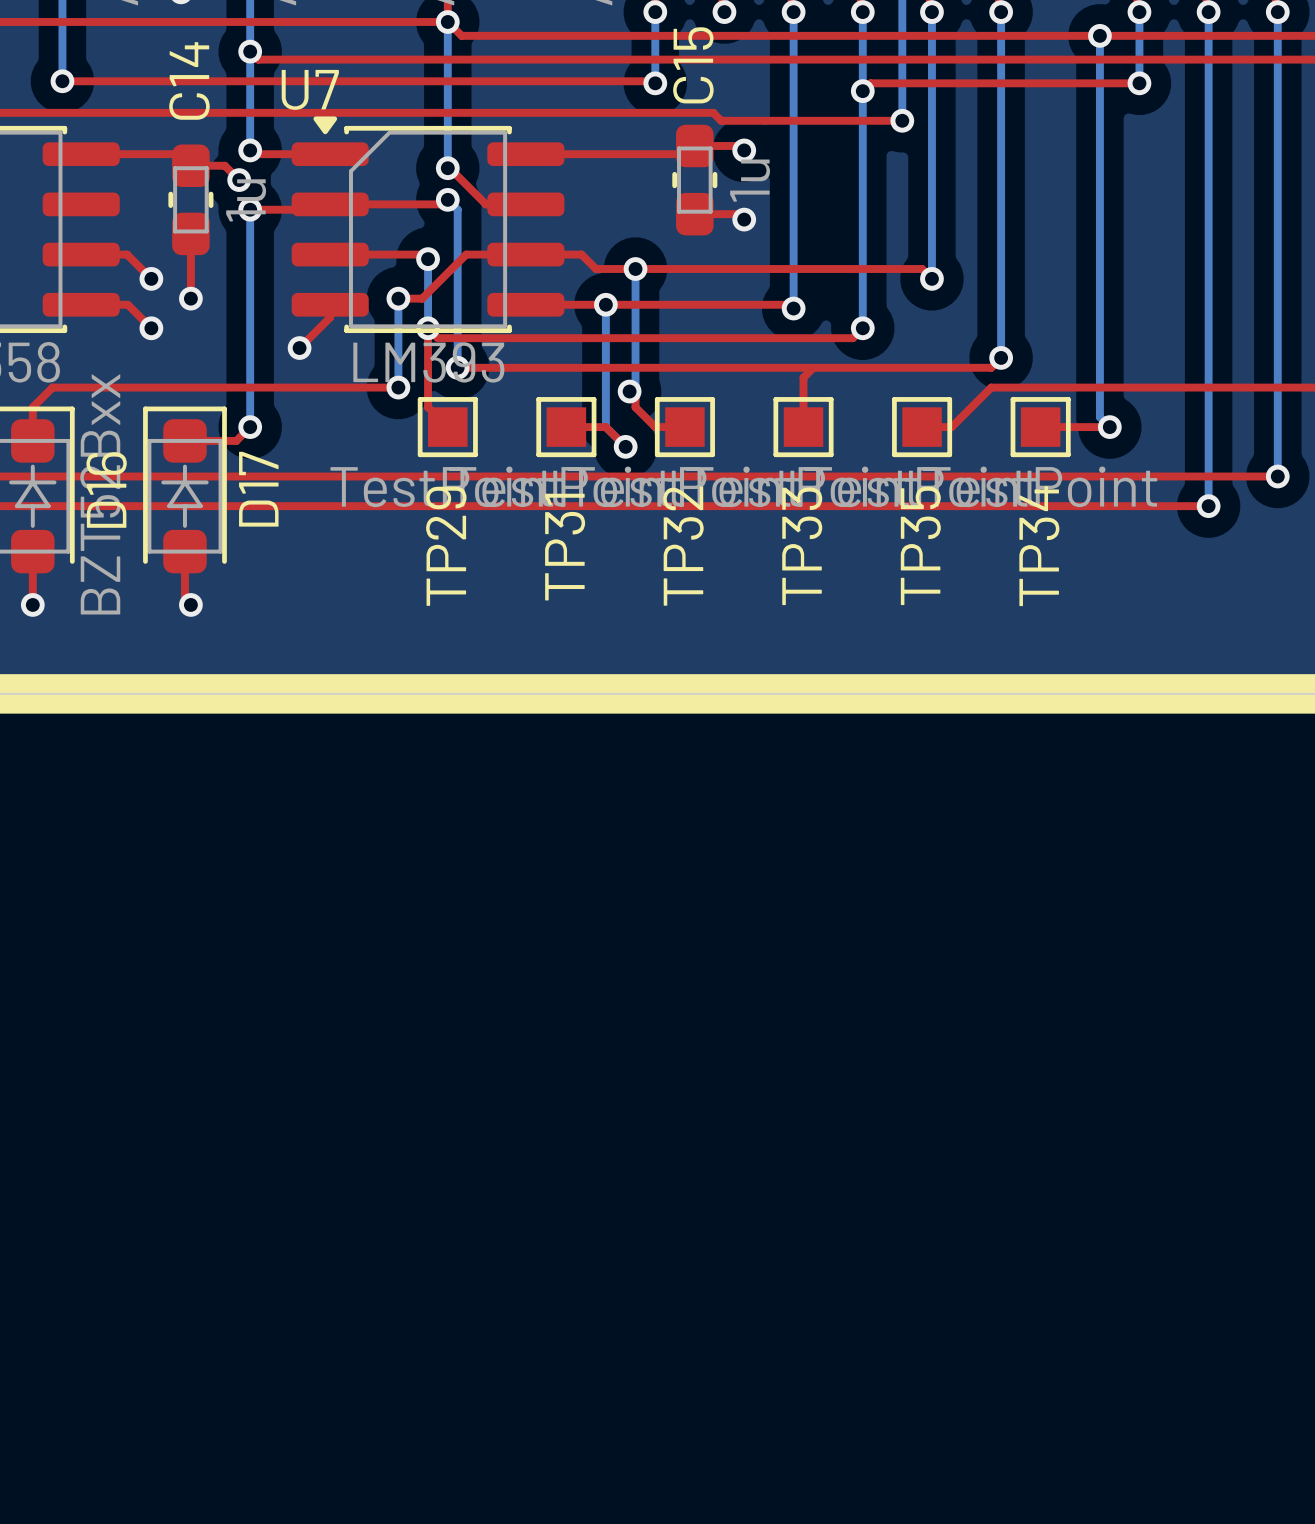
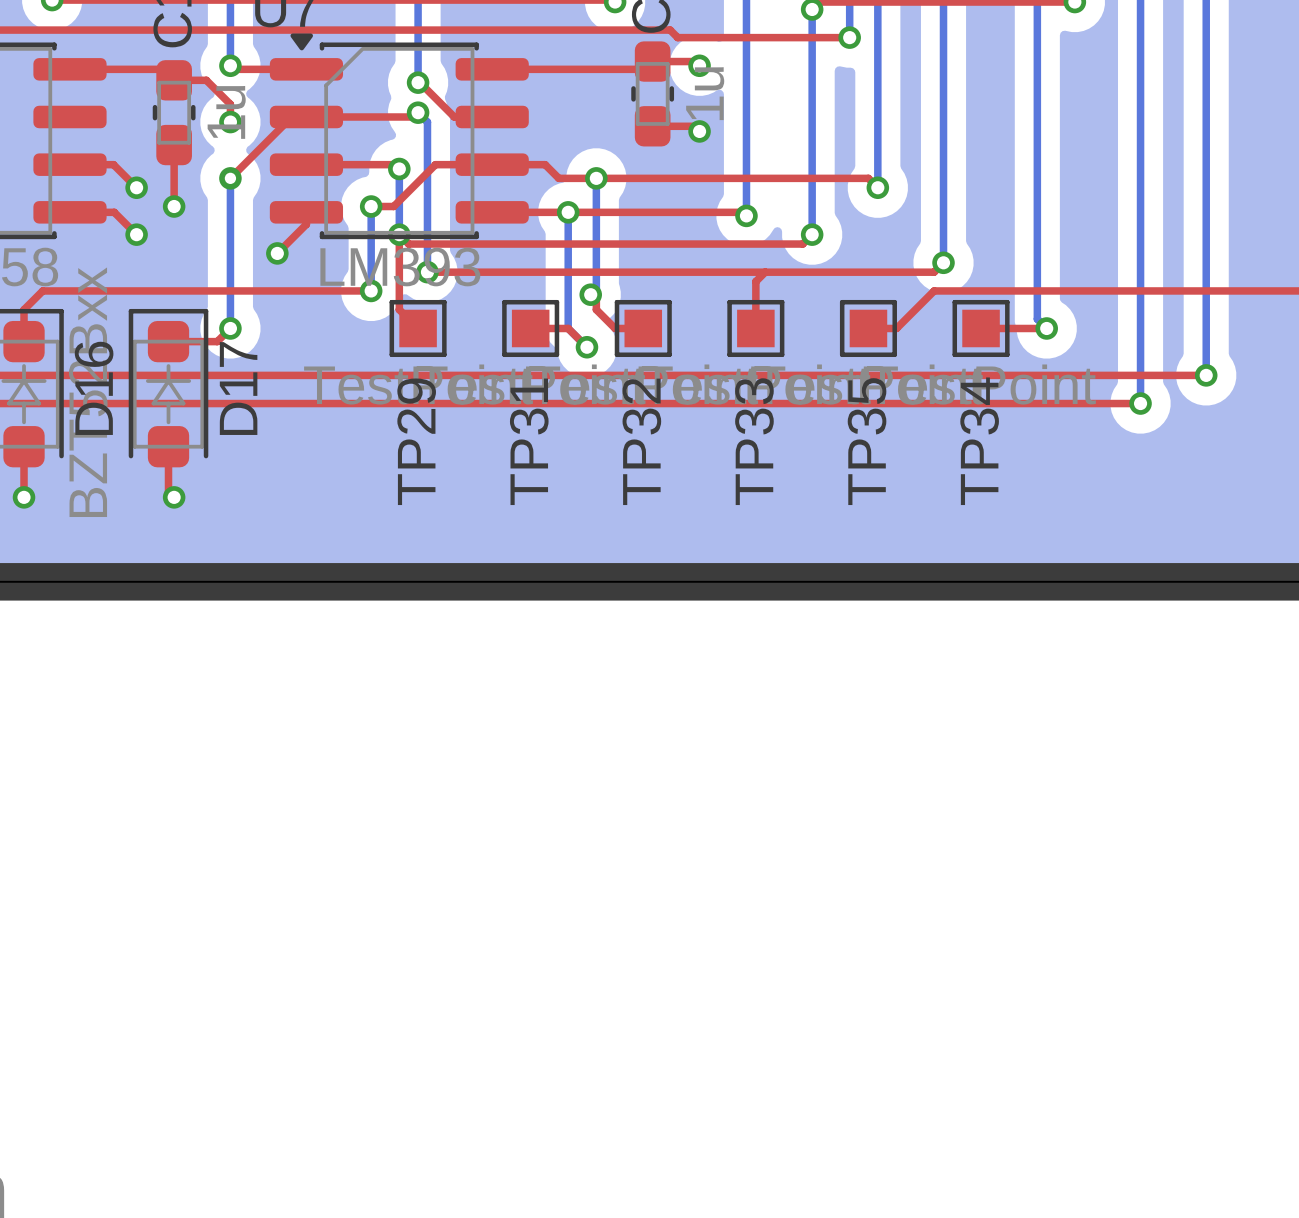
top track: none -> (219, 93) (230, 104) (230, 122)
via: (239, 180) -> none
top track: (250, 209) (309, 209) -> (230, 178) (286, 122)
bottom track: (250, 209) (250, 269) -> none
via: none -> (230, 178)

